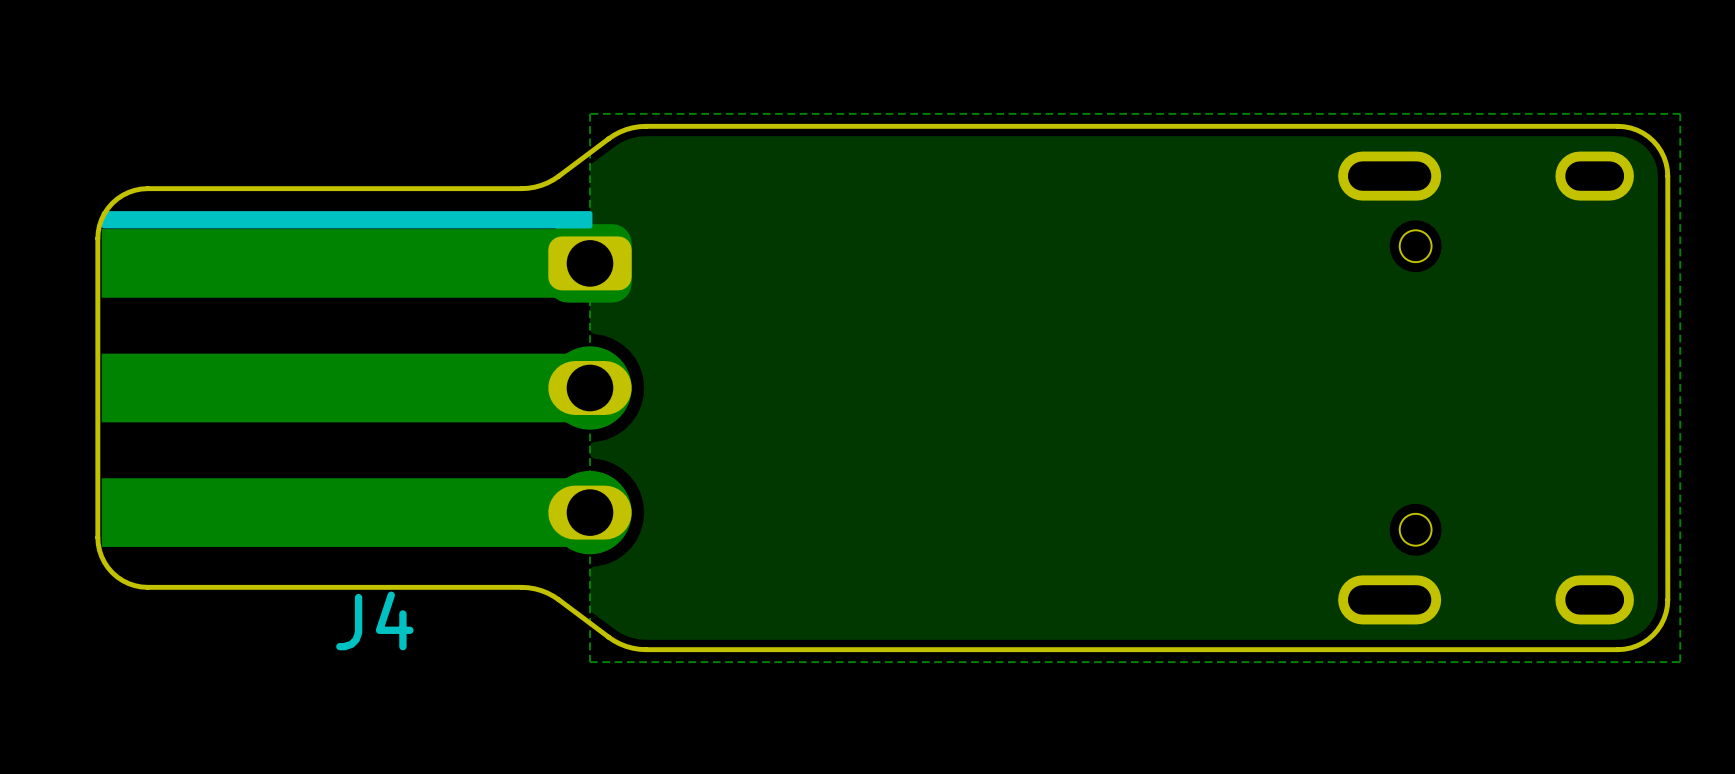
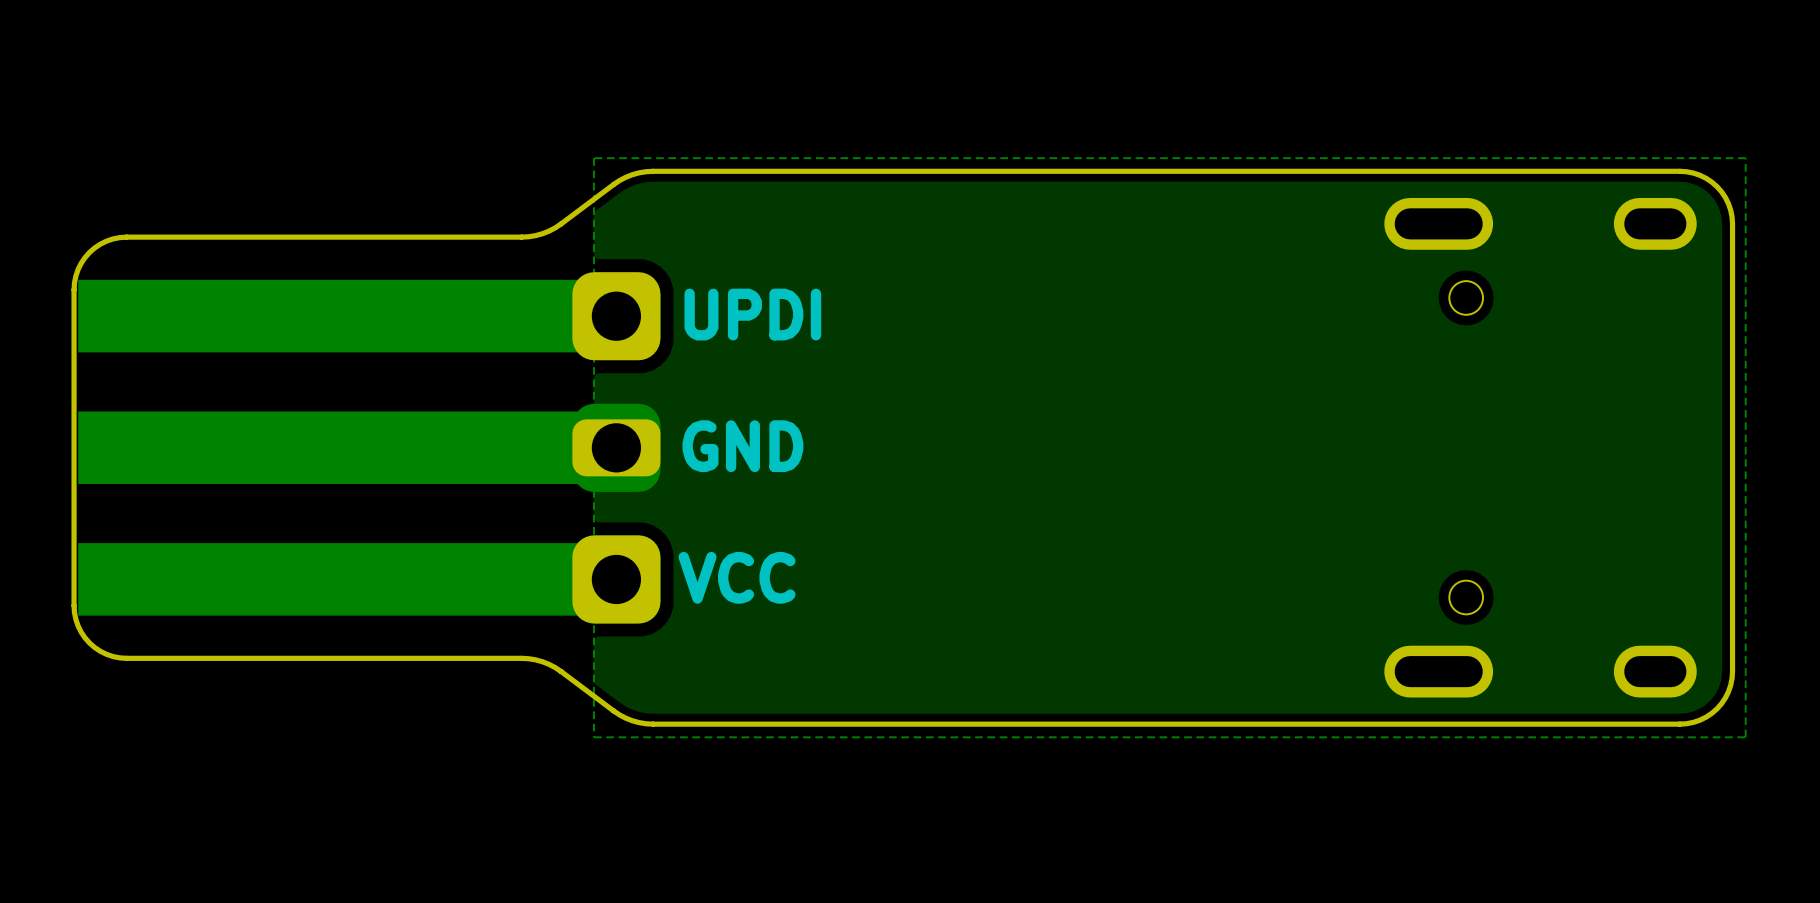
drawing: [101, 211, 593, 229] -> none
text: none -> UPDI (752, 314)
text: none -> GND (742, 446)
part: none -> (616, 447)
J4: (590, 389) -> none
text: none -> VCC (737, 577)

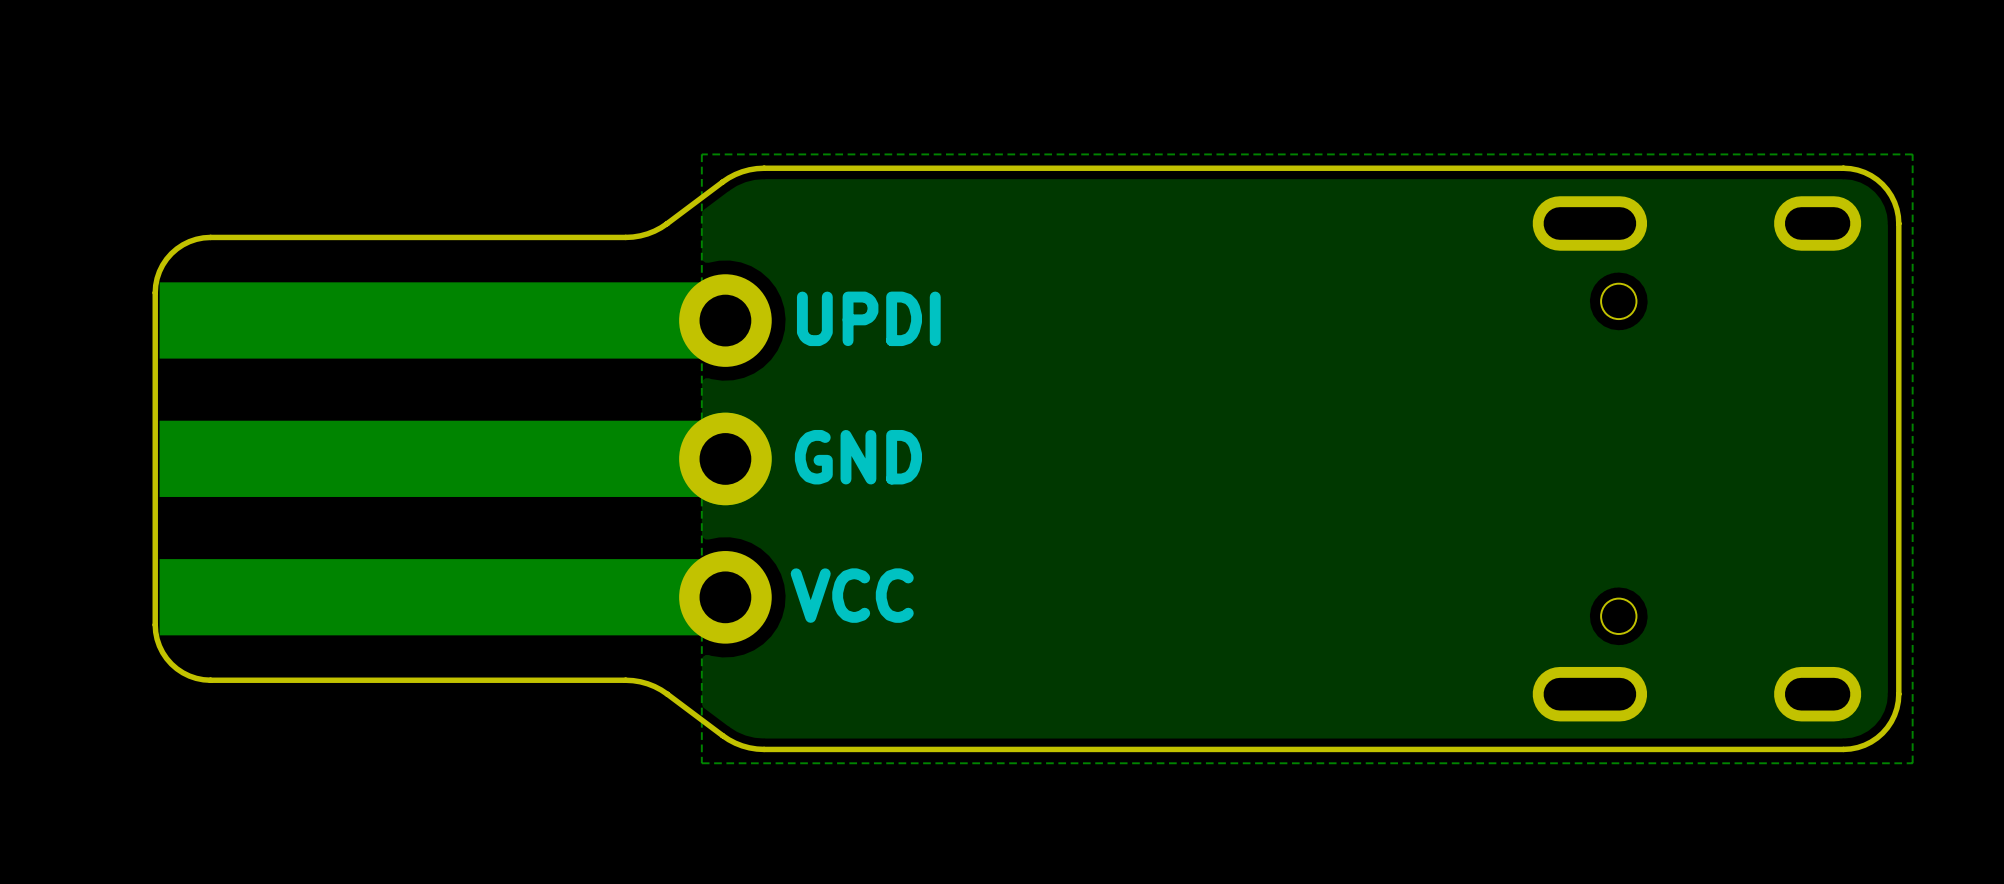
part footprint: [572, 272, 661, 624] -> [679, 274, 772, 644]

